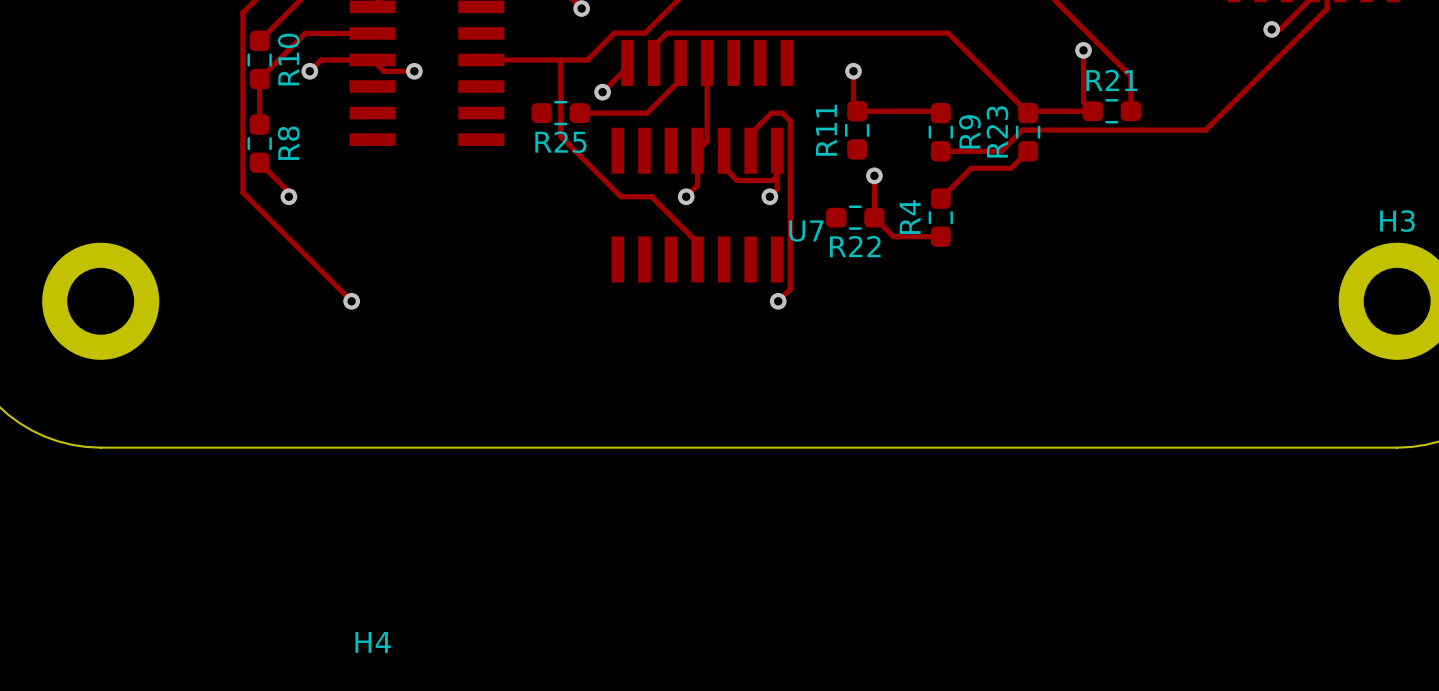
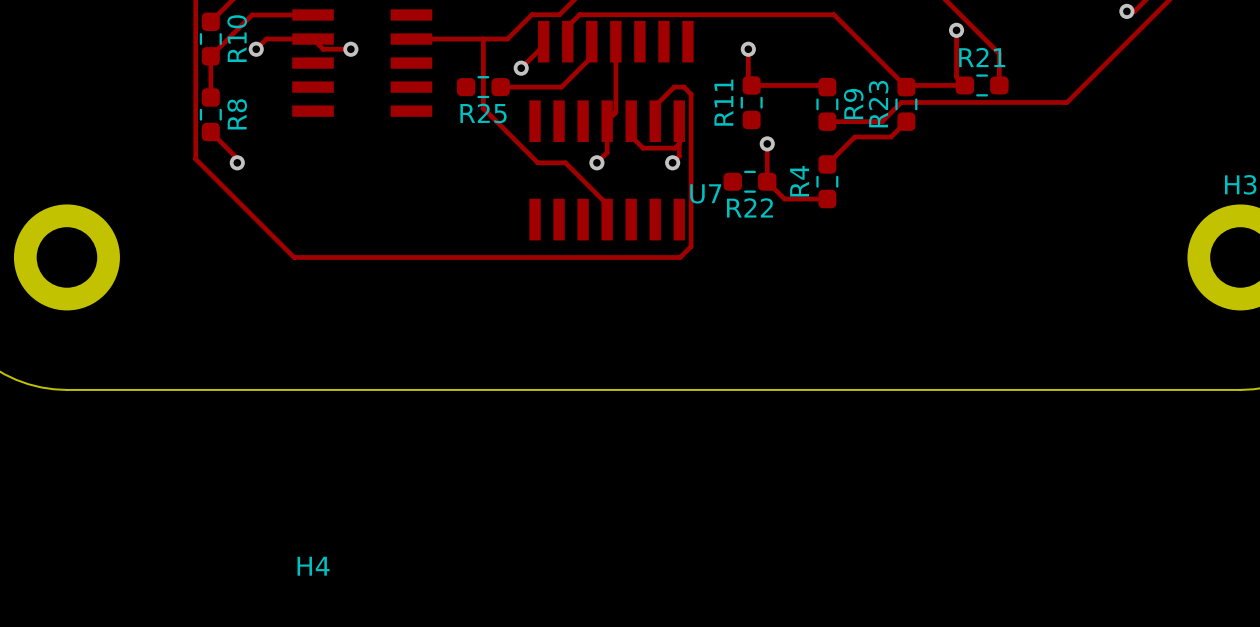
track: none -> (294, 257) (680, 257)
via: (351, 301) -> none
via: (778, 301) -> none

